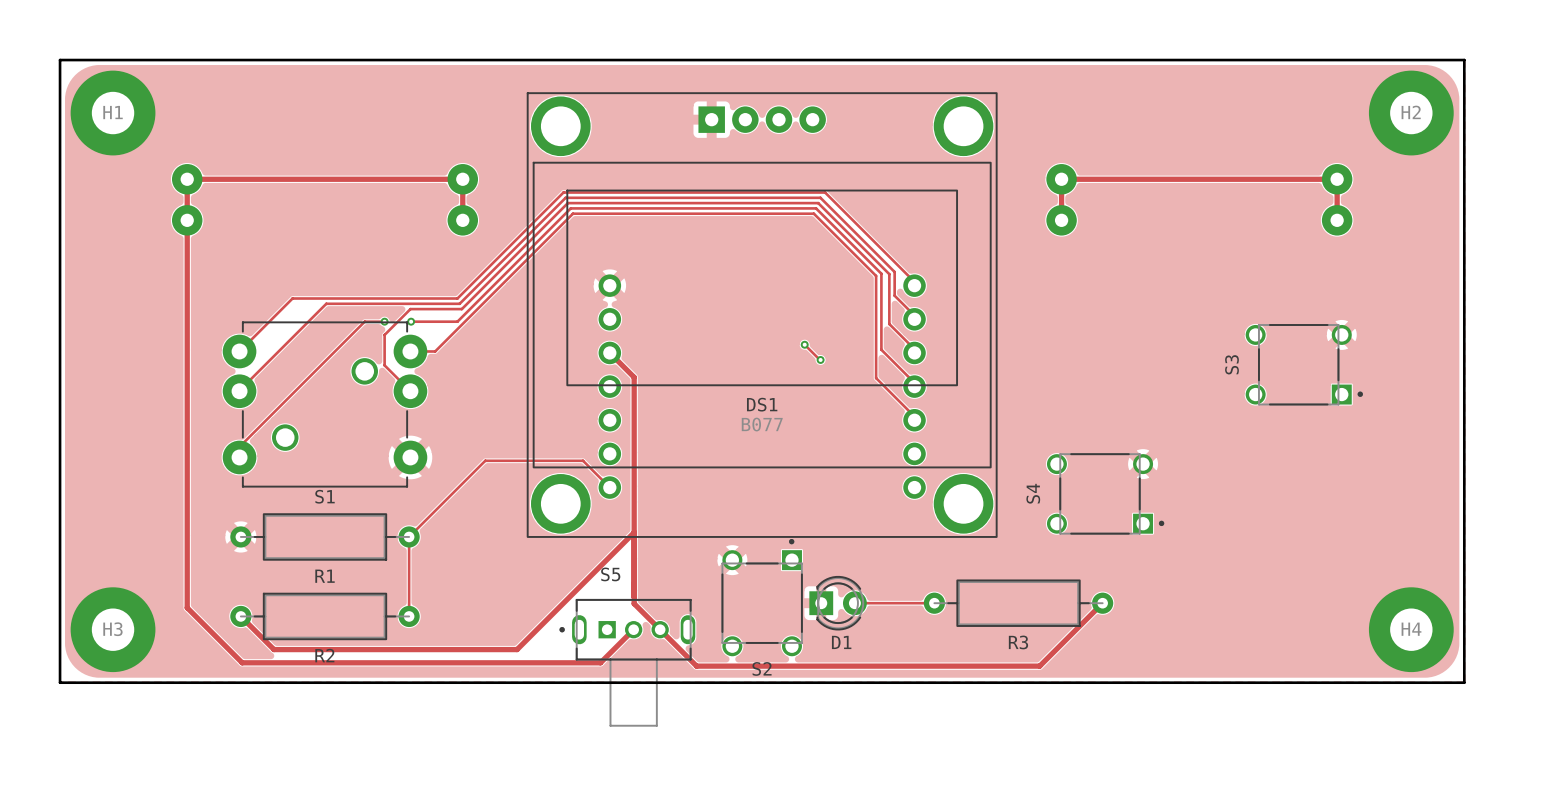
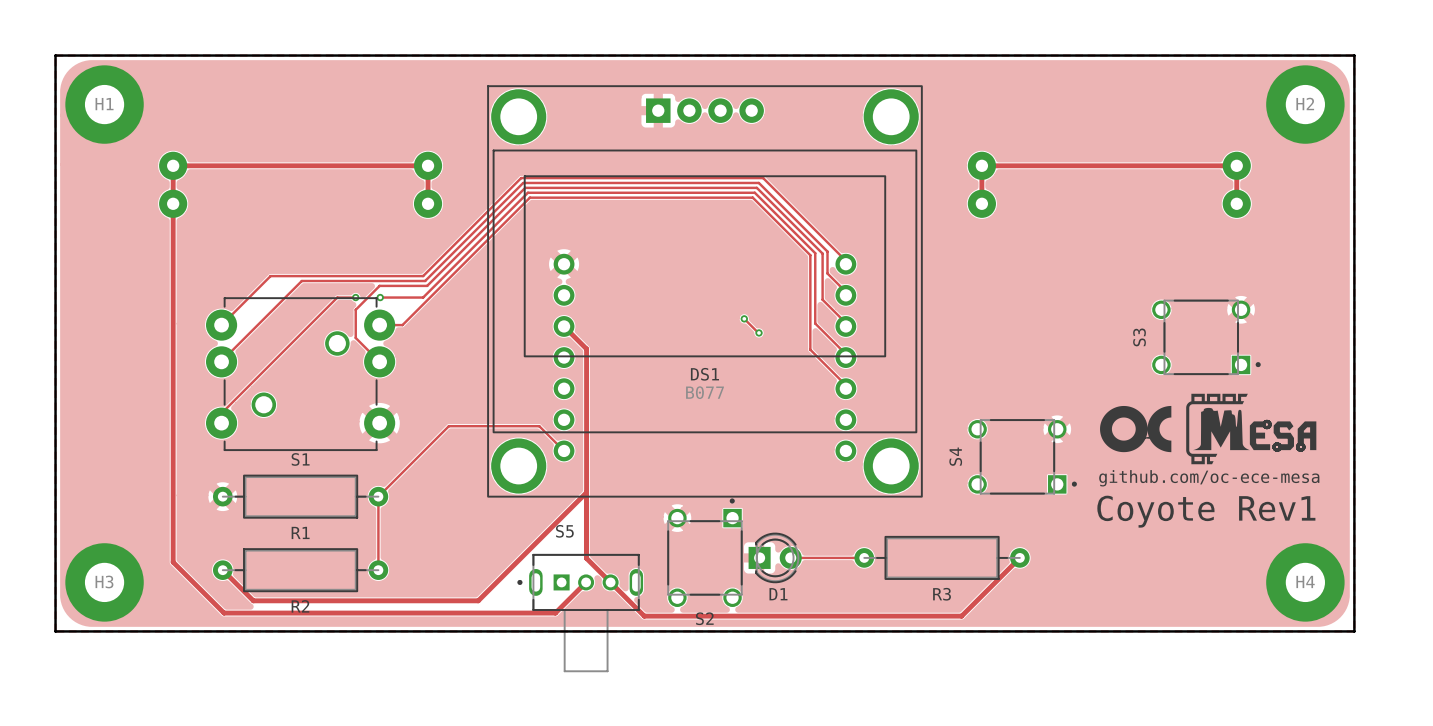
drawing: none -> [1186, 393, 1317, 465]
drawing: none -> [1100, 405, 1172, 453]
text: none -> github.com/oc-ece-mesa (1209, 478)
text: none -> Coyote Rev1 (1206, 511)

